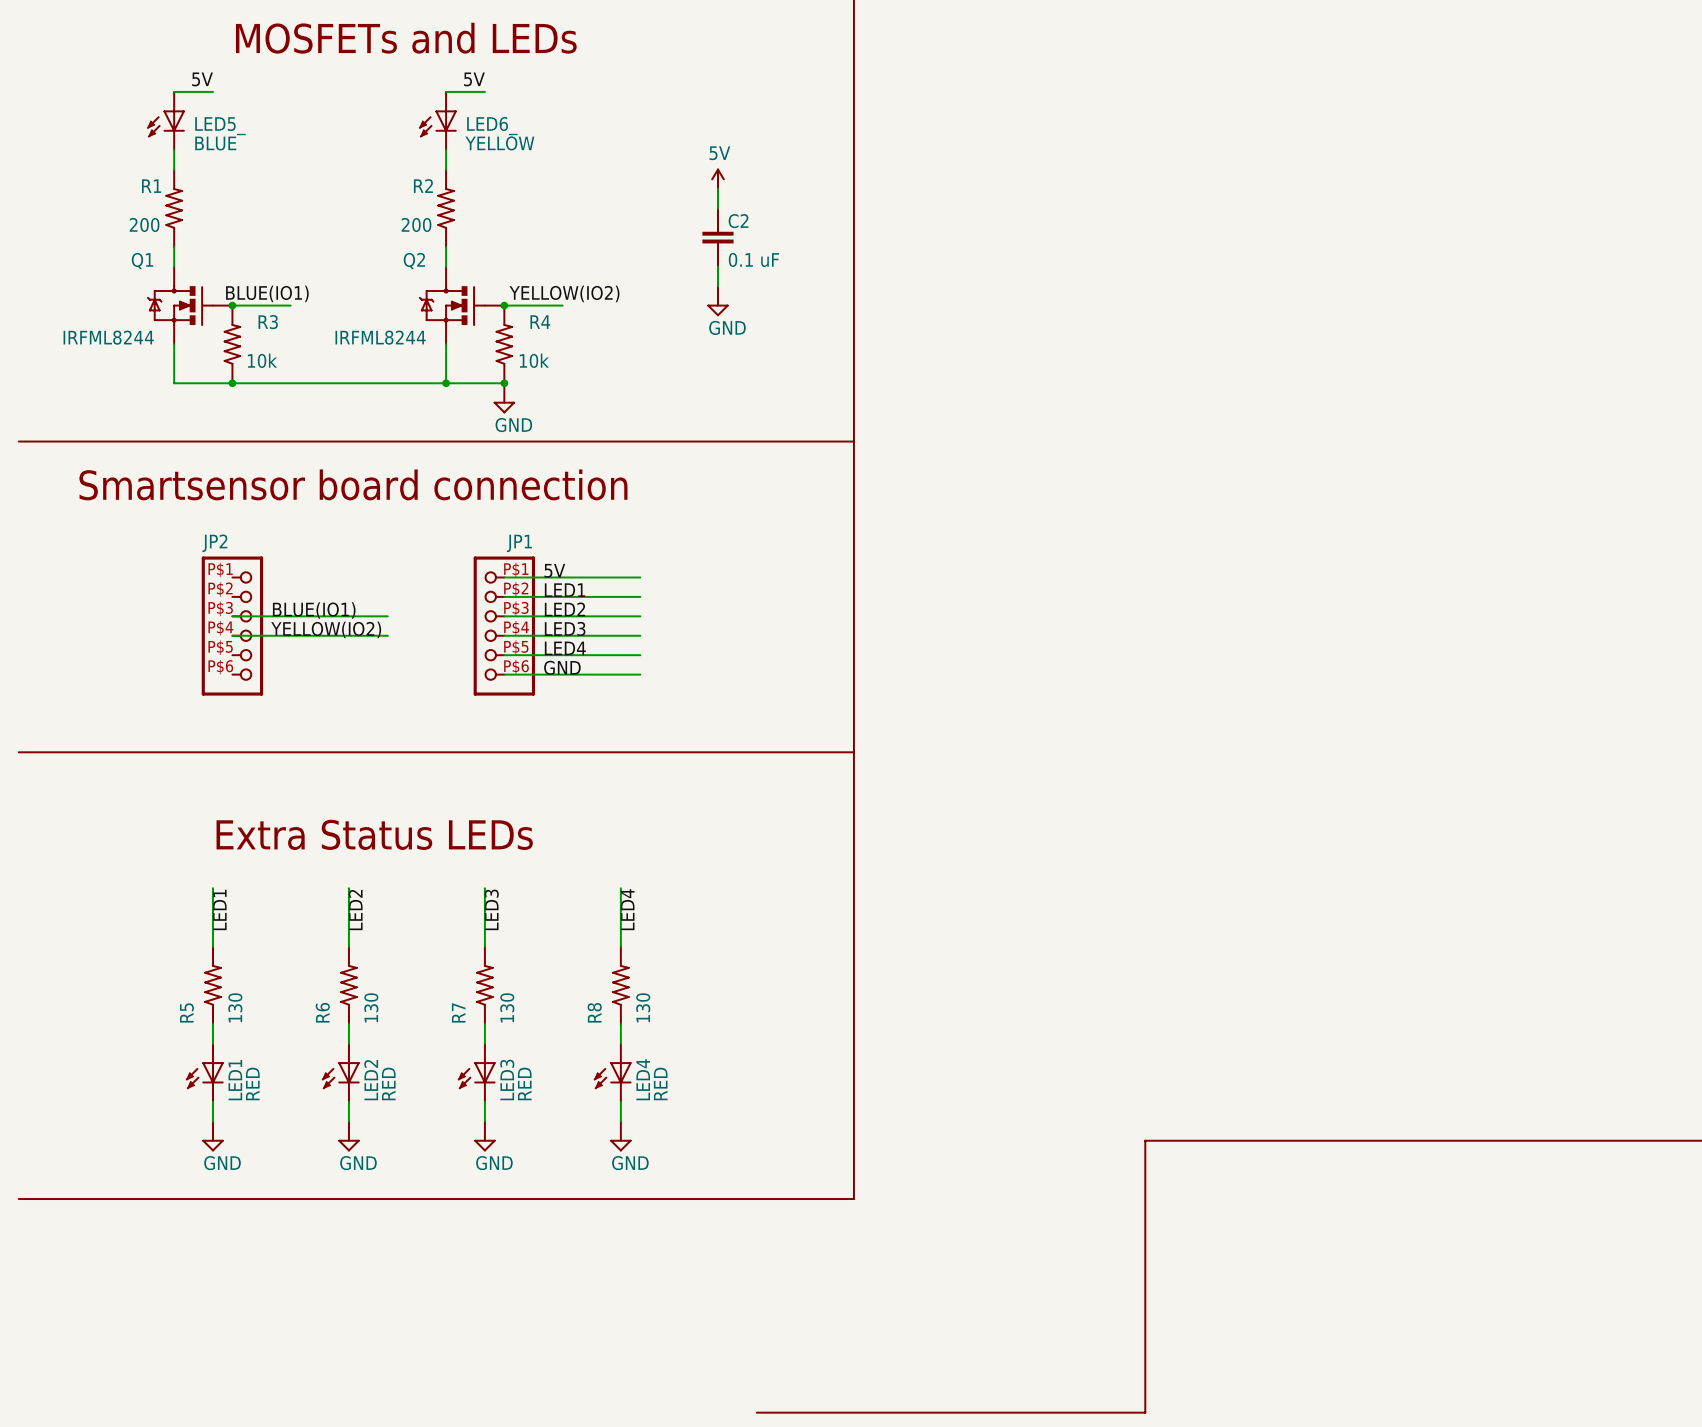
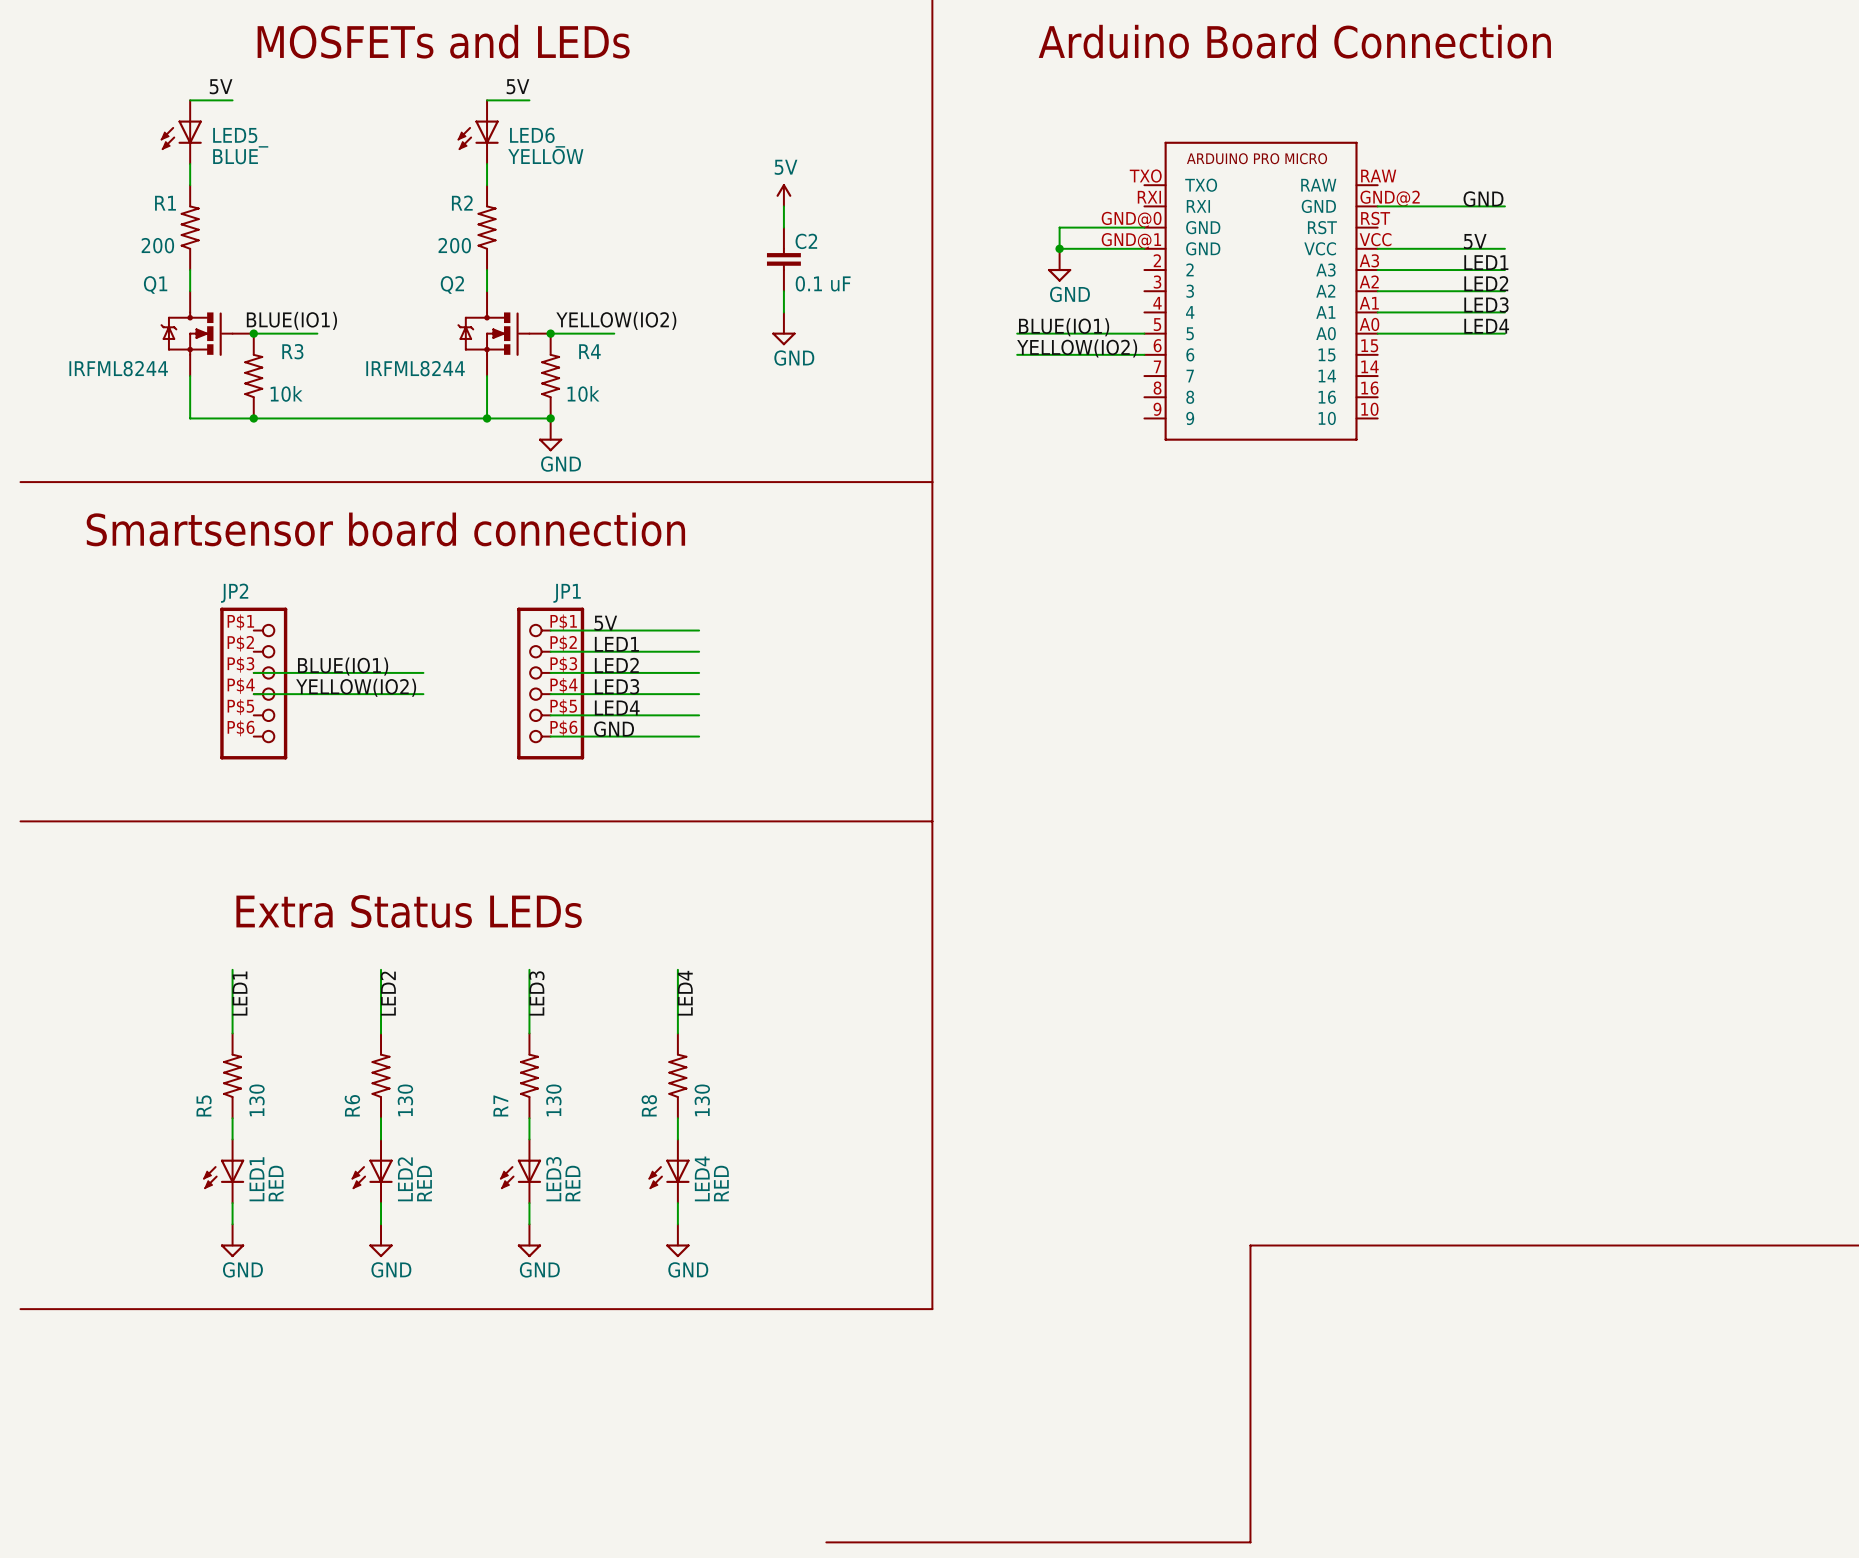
text: none -> Arduino Board Connection (1294, 41)
label: none -> GND (1483, 198)
wire: none -> (1377, 206) (1504, 206)
wire: none -> (1144, 227) (1059, 227) (1059, 248) (1144, 248)
label: none -> 5V (1475, 241)
junction: none -> (1059, 248)
wire: none -> (1377, 248) (1504, 248)
label: none -> LED1 (1486, 262)
power symbol: none -> GND (1059, 265)
wire: none -> (1377, 270) (1504, 270)
label: none -> LED2 (1486, 283)
part: none -> (1261, 291)
wire: none -> (1377, 291) (1504, 291)
label: none -> LED3 (1486, 305)
wire: none -> (1377, 312) (1504, 312)
label: none -> LED4 (1486, 326)
label: none -> BLUE(IO1) (1064, 327)
wire: none -> (1017, 333) (1144, 333)
wire: none -> (1377, 333) (1504, 333)
label: none -> YELLOW(IO2) (1077, 348)
wire: none -> (1017, 354) (1144, 354)

